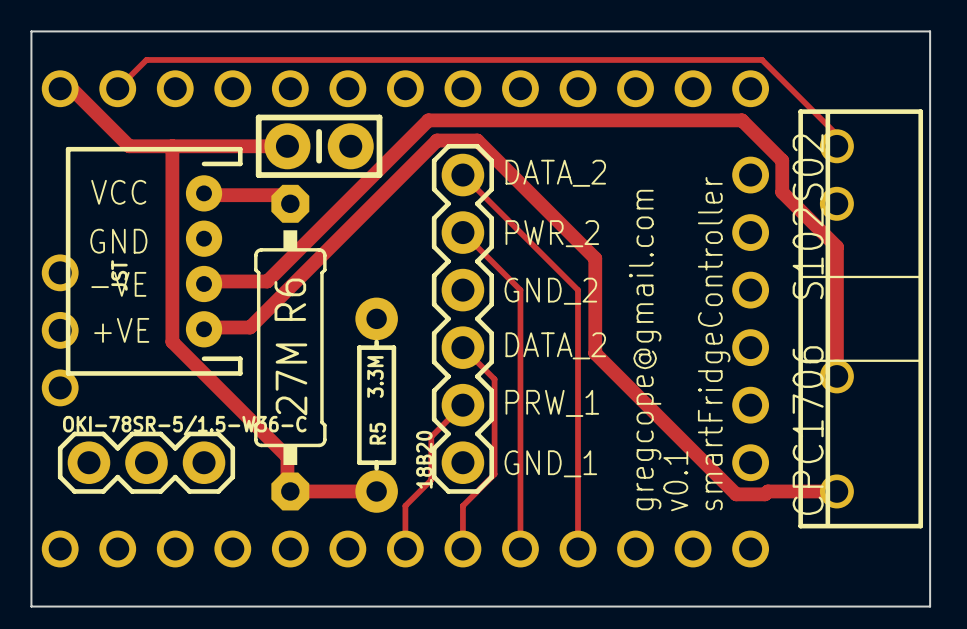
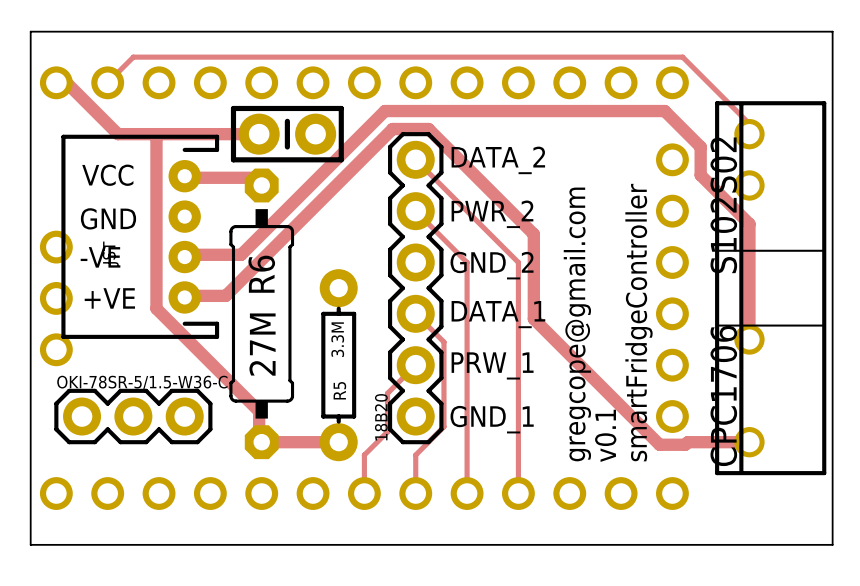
text: DATA_2 (555, 345) -> DATA_1 (498, 314)

